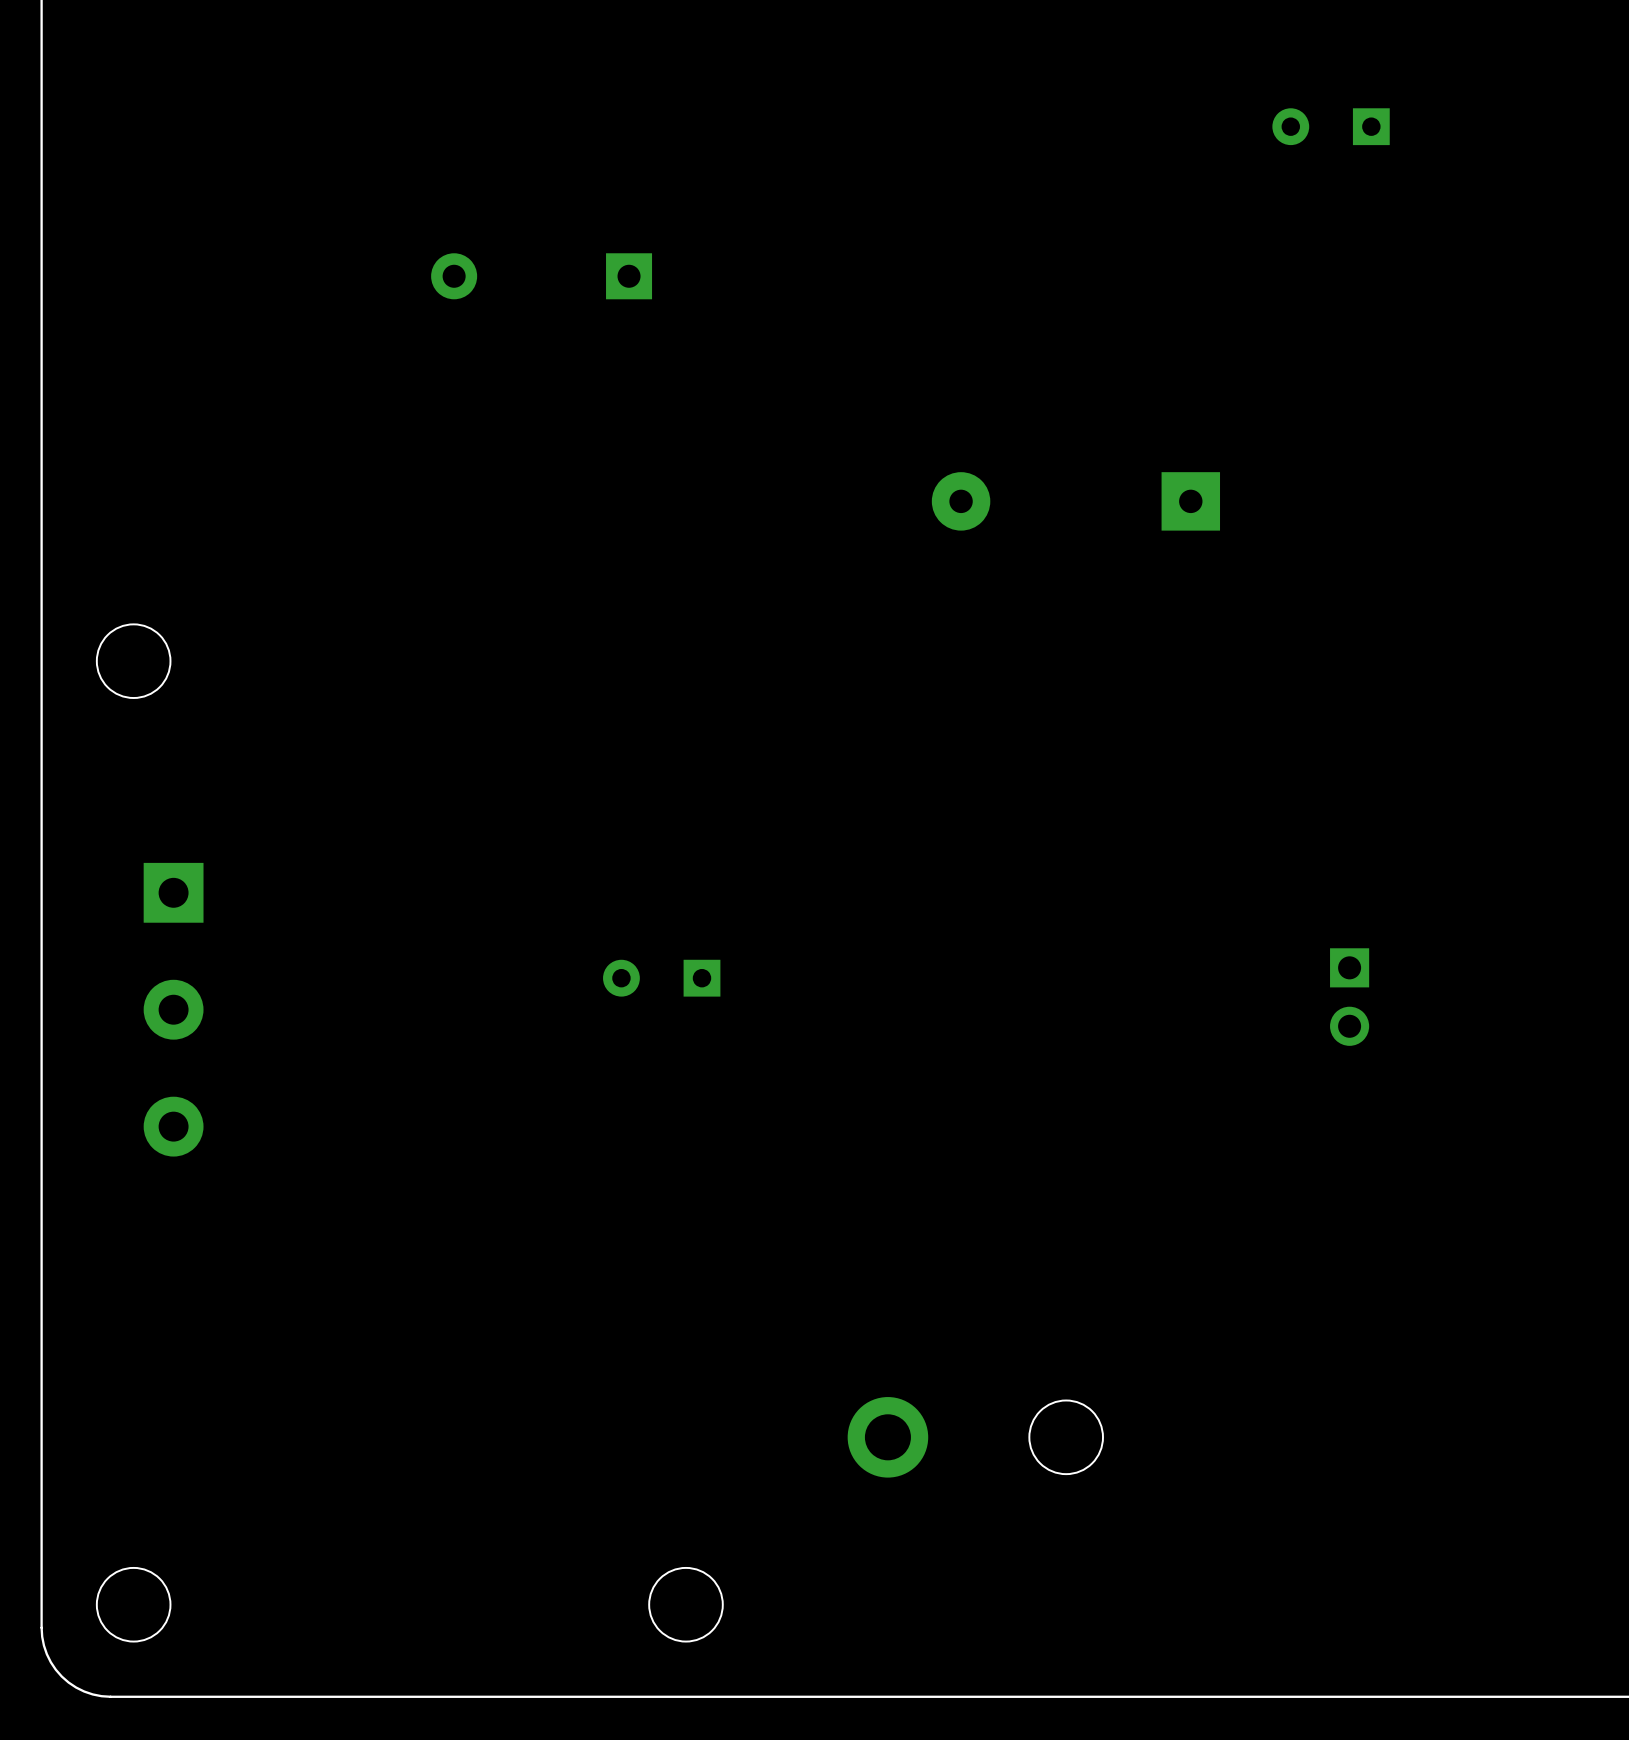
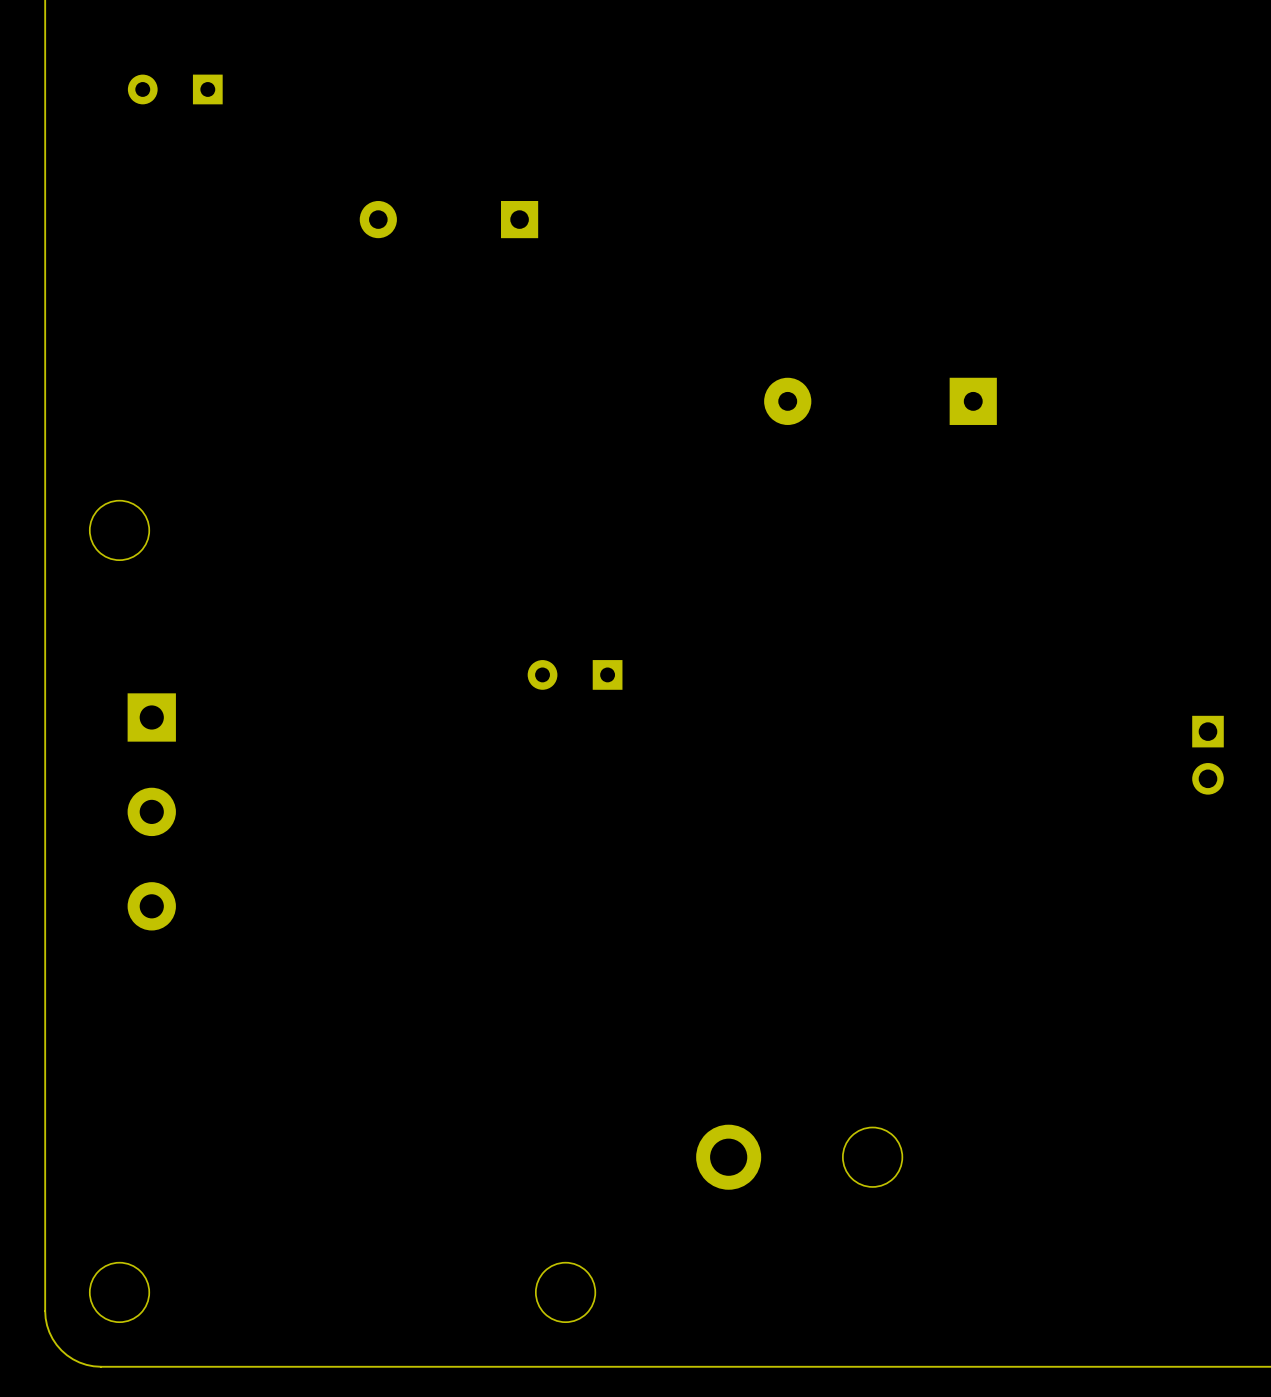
part: none -> (175, 89)
part: (1331, 126) -> none
part position: (661, 978) -> (575, 674)
part position: (1349, 997) -> (1208, 755)

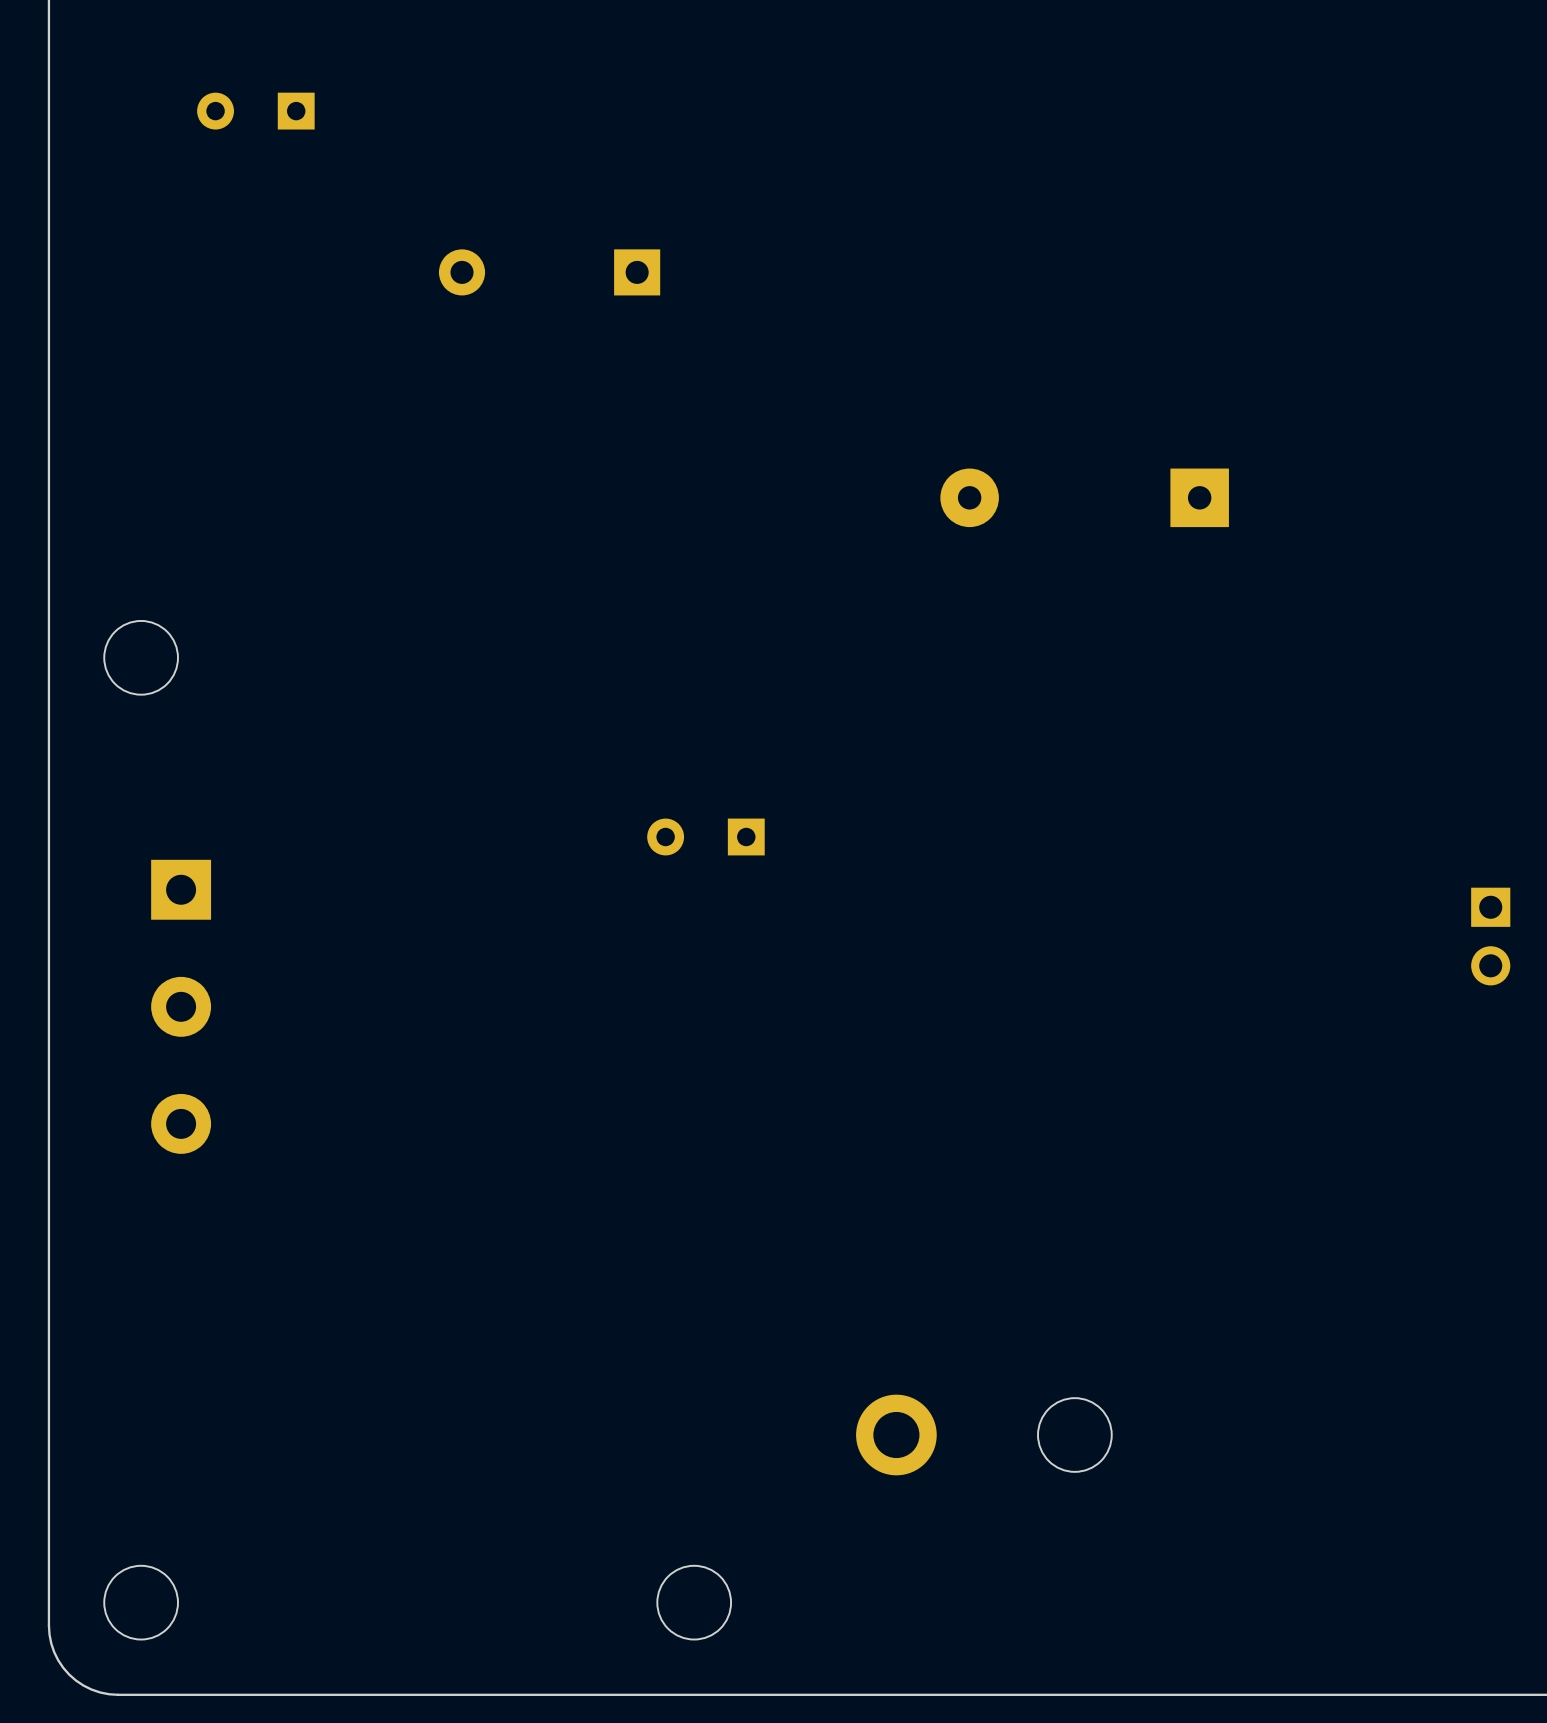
part position: (175, 89) -> (255, 111)

